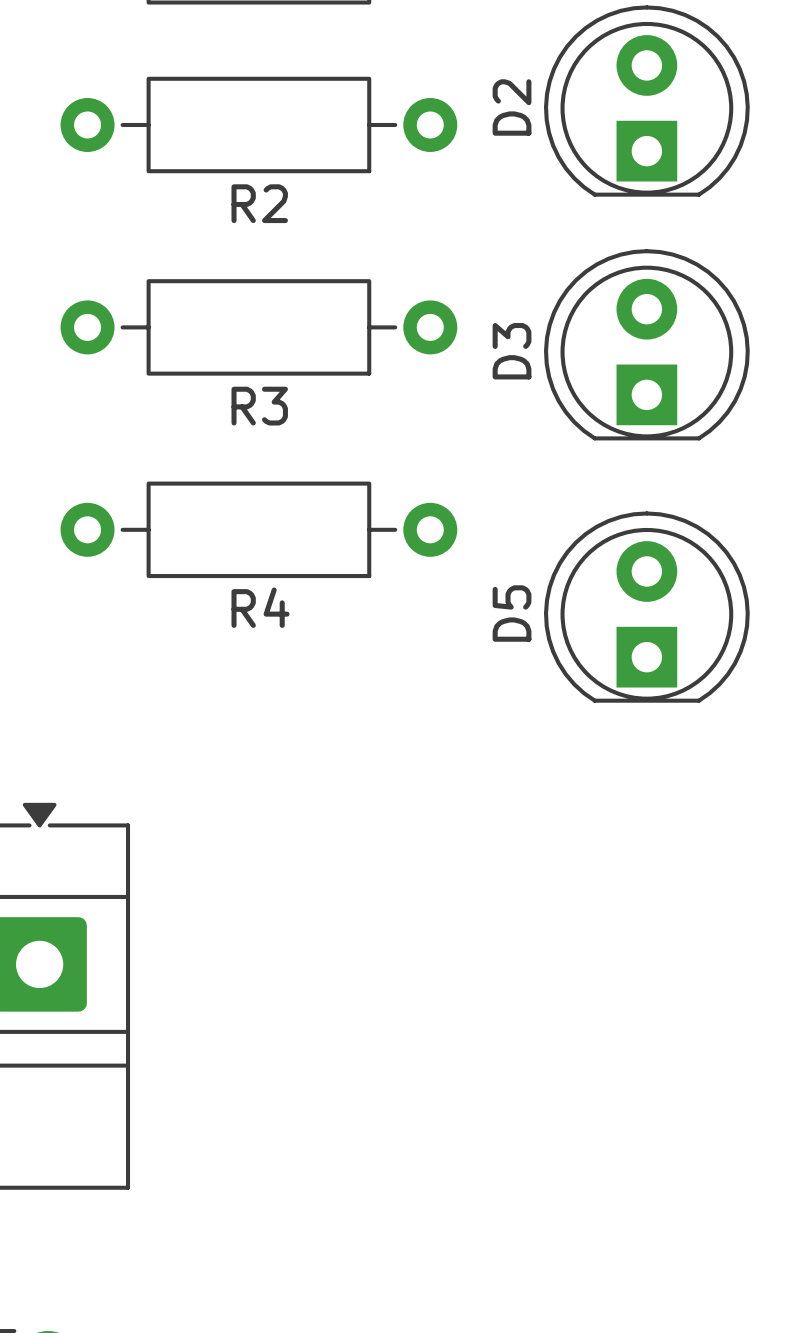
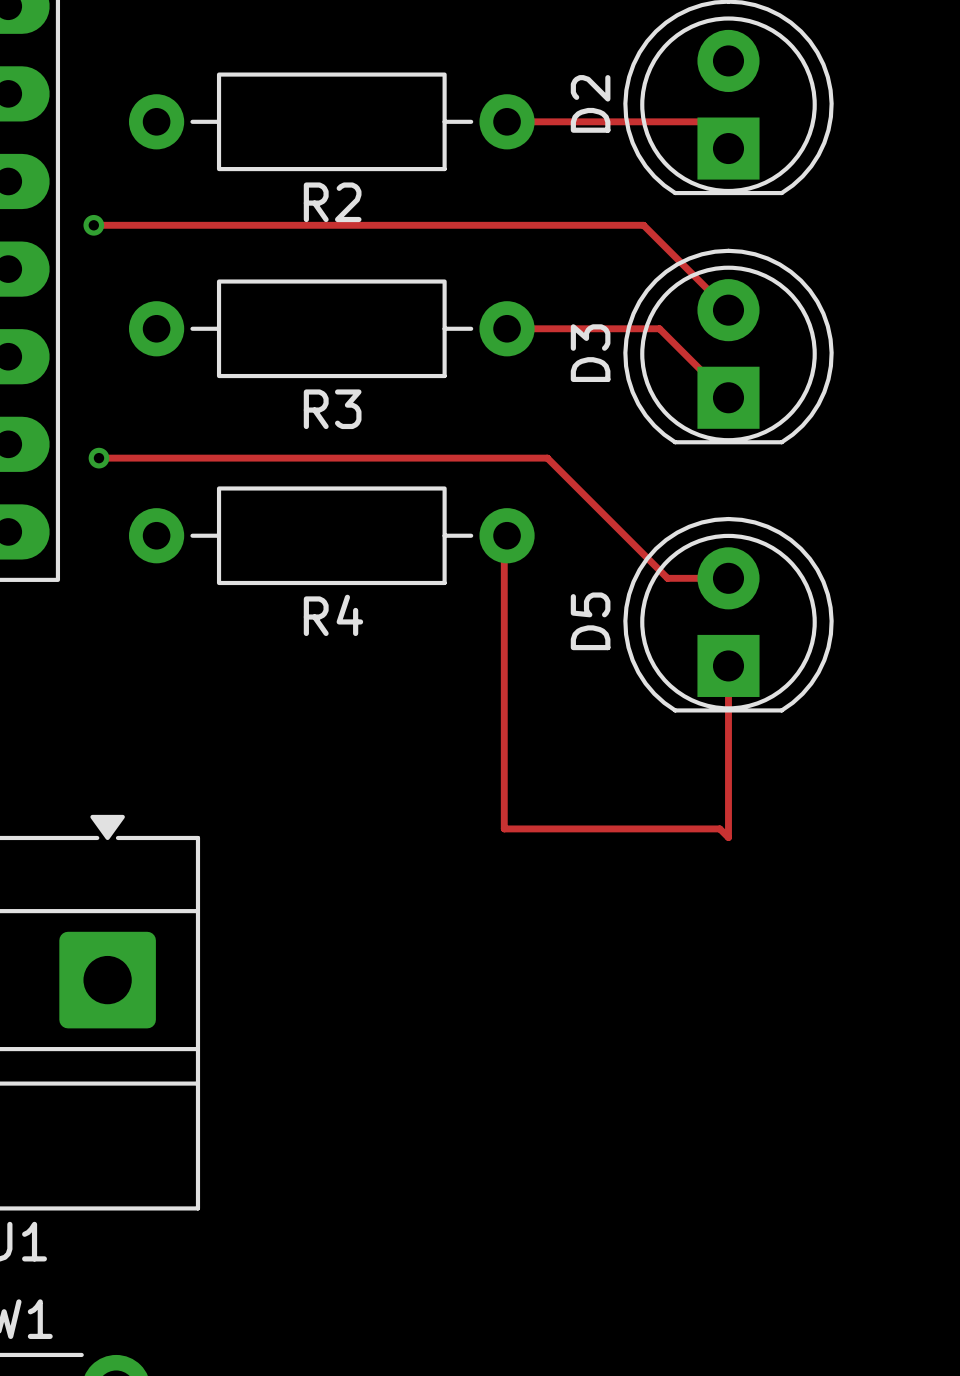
track: none -> (507, 121) (701, 121) (728, 148)
track: none -> (93, 225) (643, 225) (728, 310)
via: none -> (93, 225)
track: none -> (507, 328) (659, 328) (728, 397)
track: none -> (98, 458) (547, 458) (667, 578) (728, 578)
via: none -> (98, 458)
track: none -> (507, 535) (504, 535) (504, 828) (719, 828) (728, 837) (728, 665)

